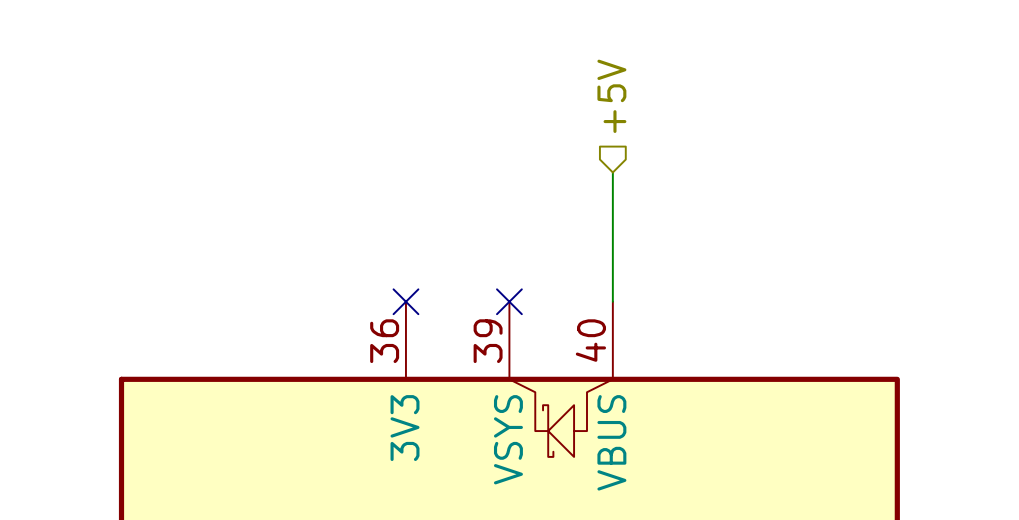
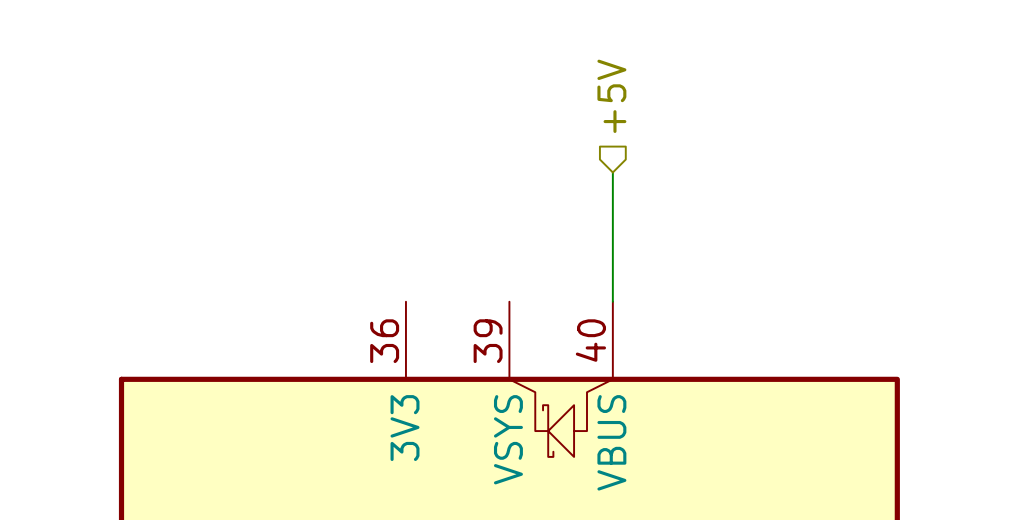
no-connect mark: (405, 301) -> none
no-connect mark: (509, 301) -> none

